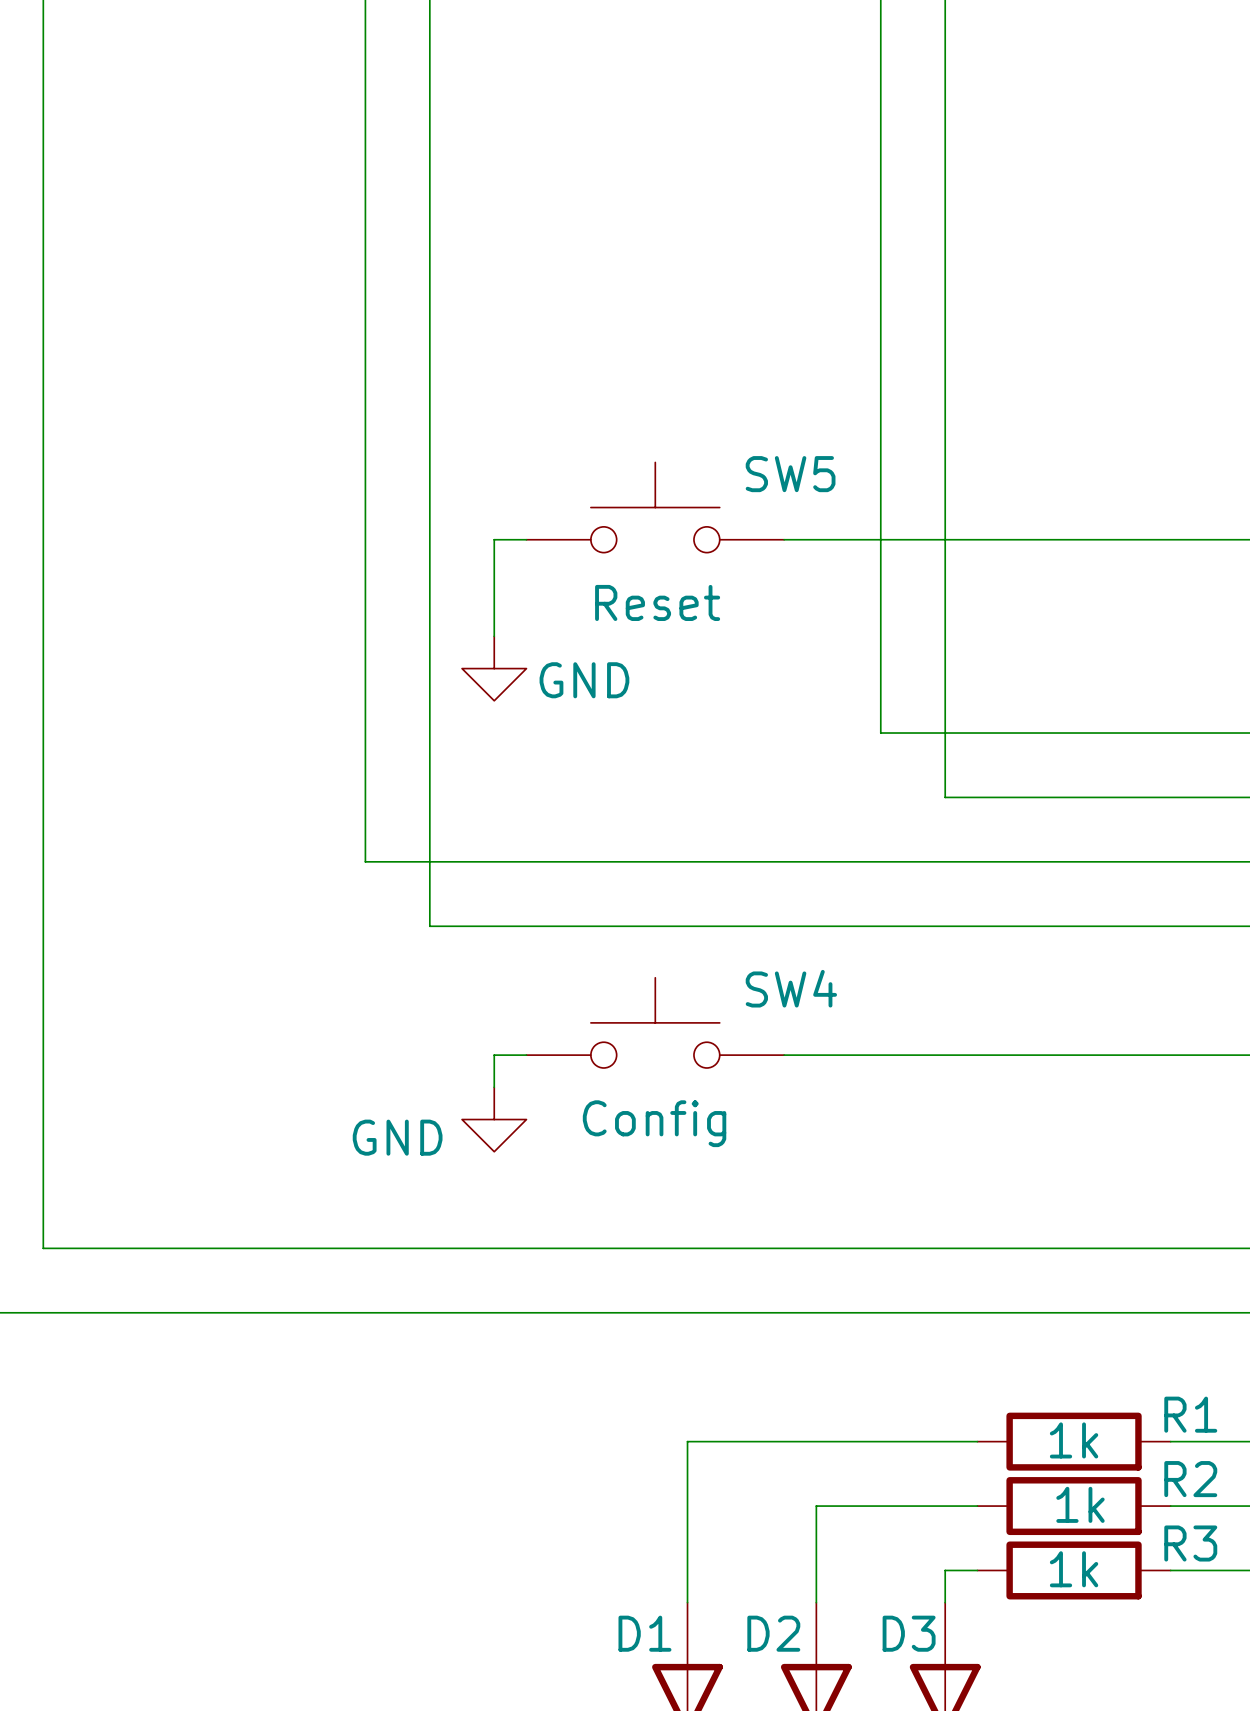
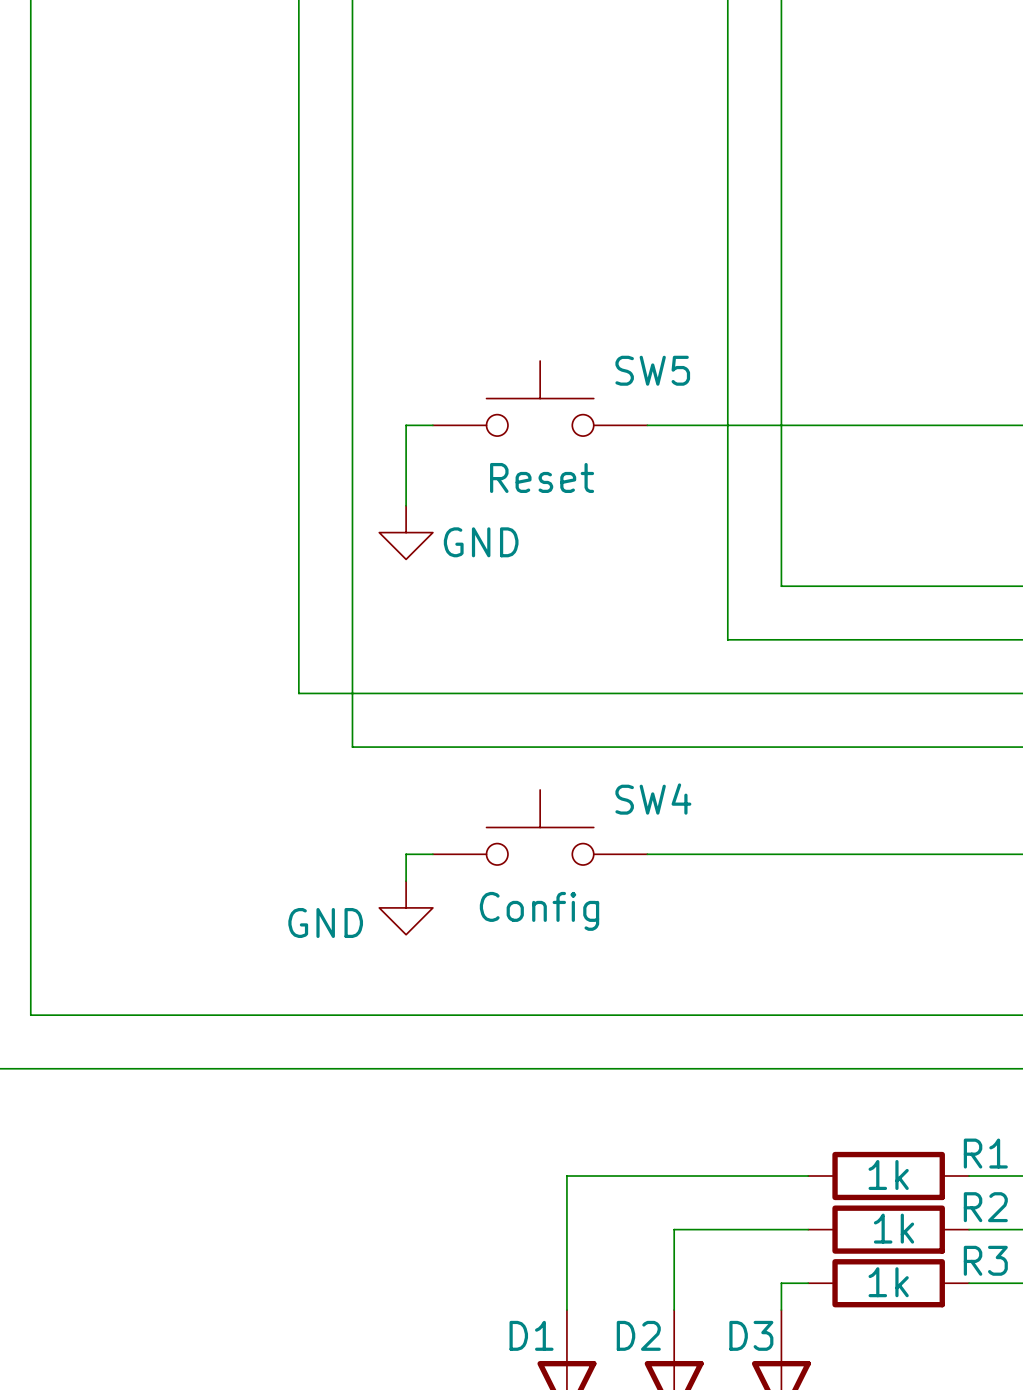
wire: (880, 733) (945, 733) (945, 797) -> (727, 586) (727, 639) (781, 639)

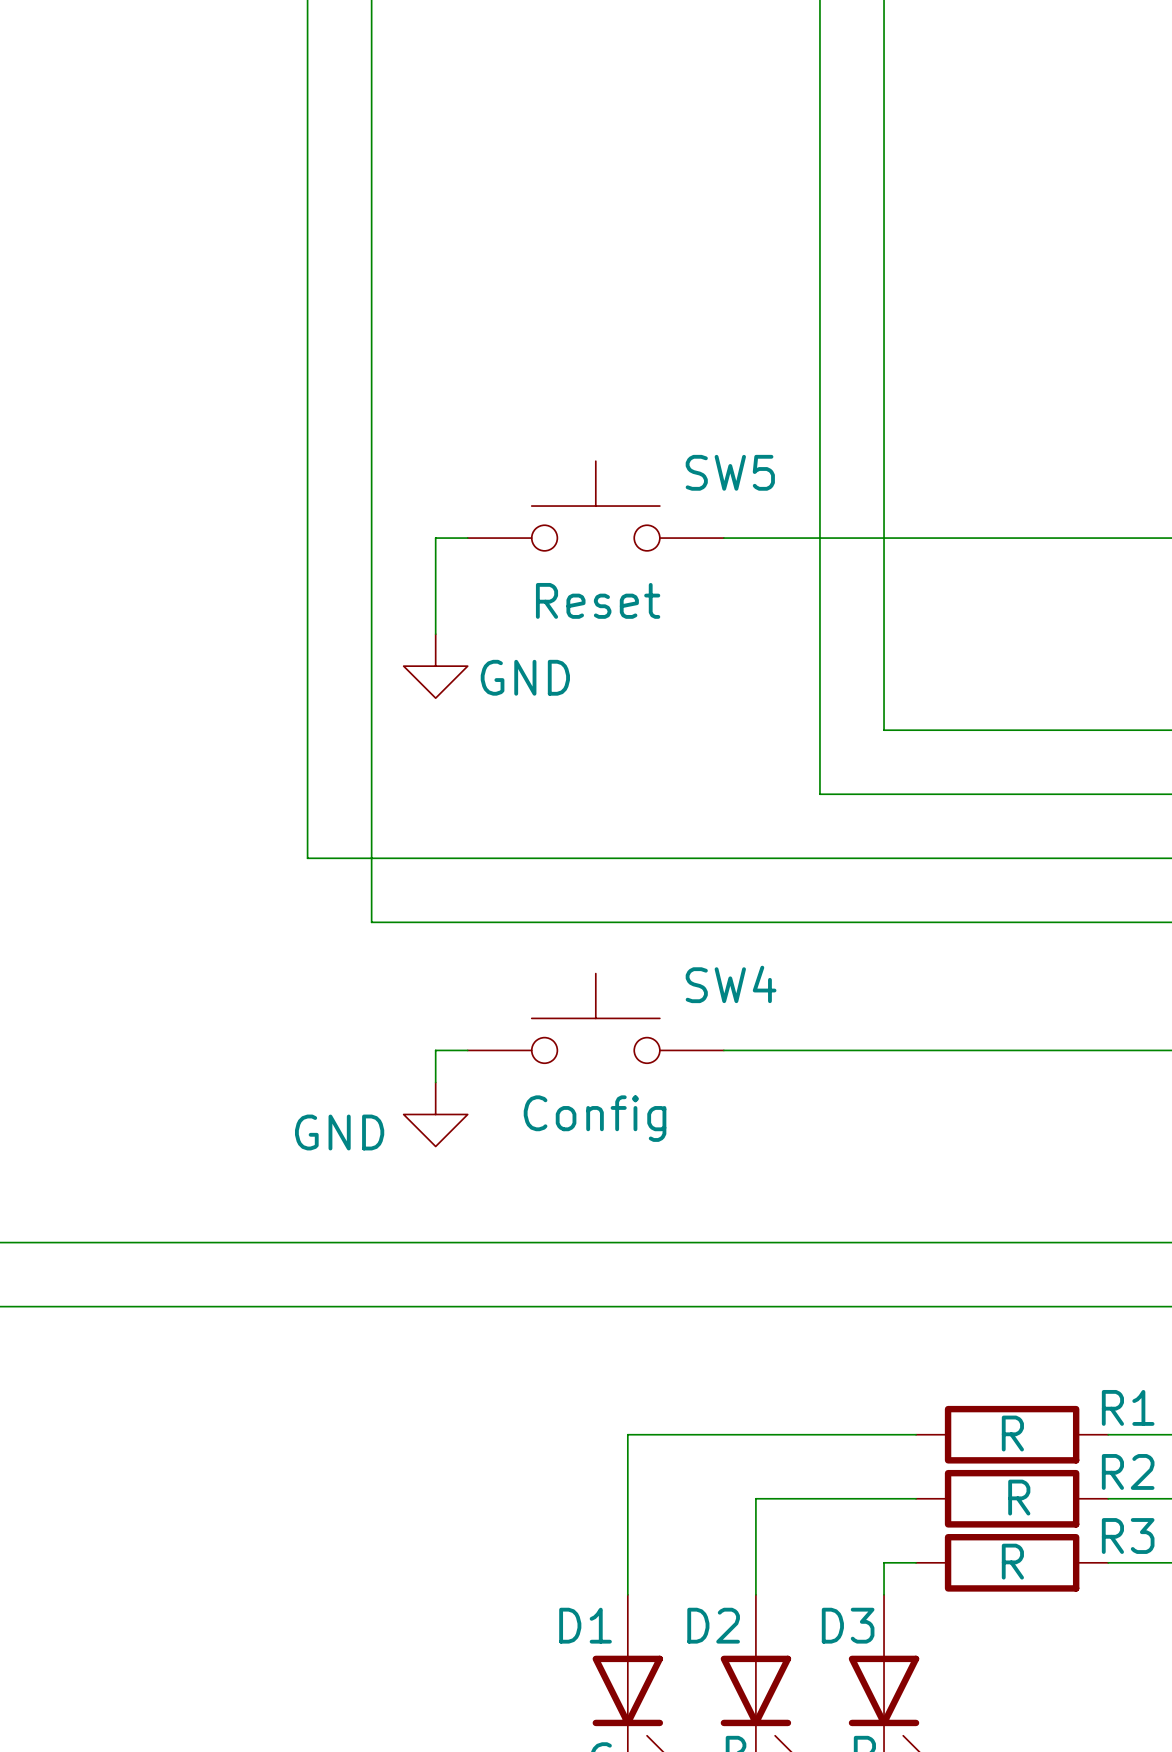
R1 value: 1k (888, 1175) -> R (1012, 1433)
R2 value: 1k (894, 1228) -> R (1019, 1497)
R3 value: 1k (888, 1282) -> R (1012, 1561)

